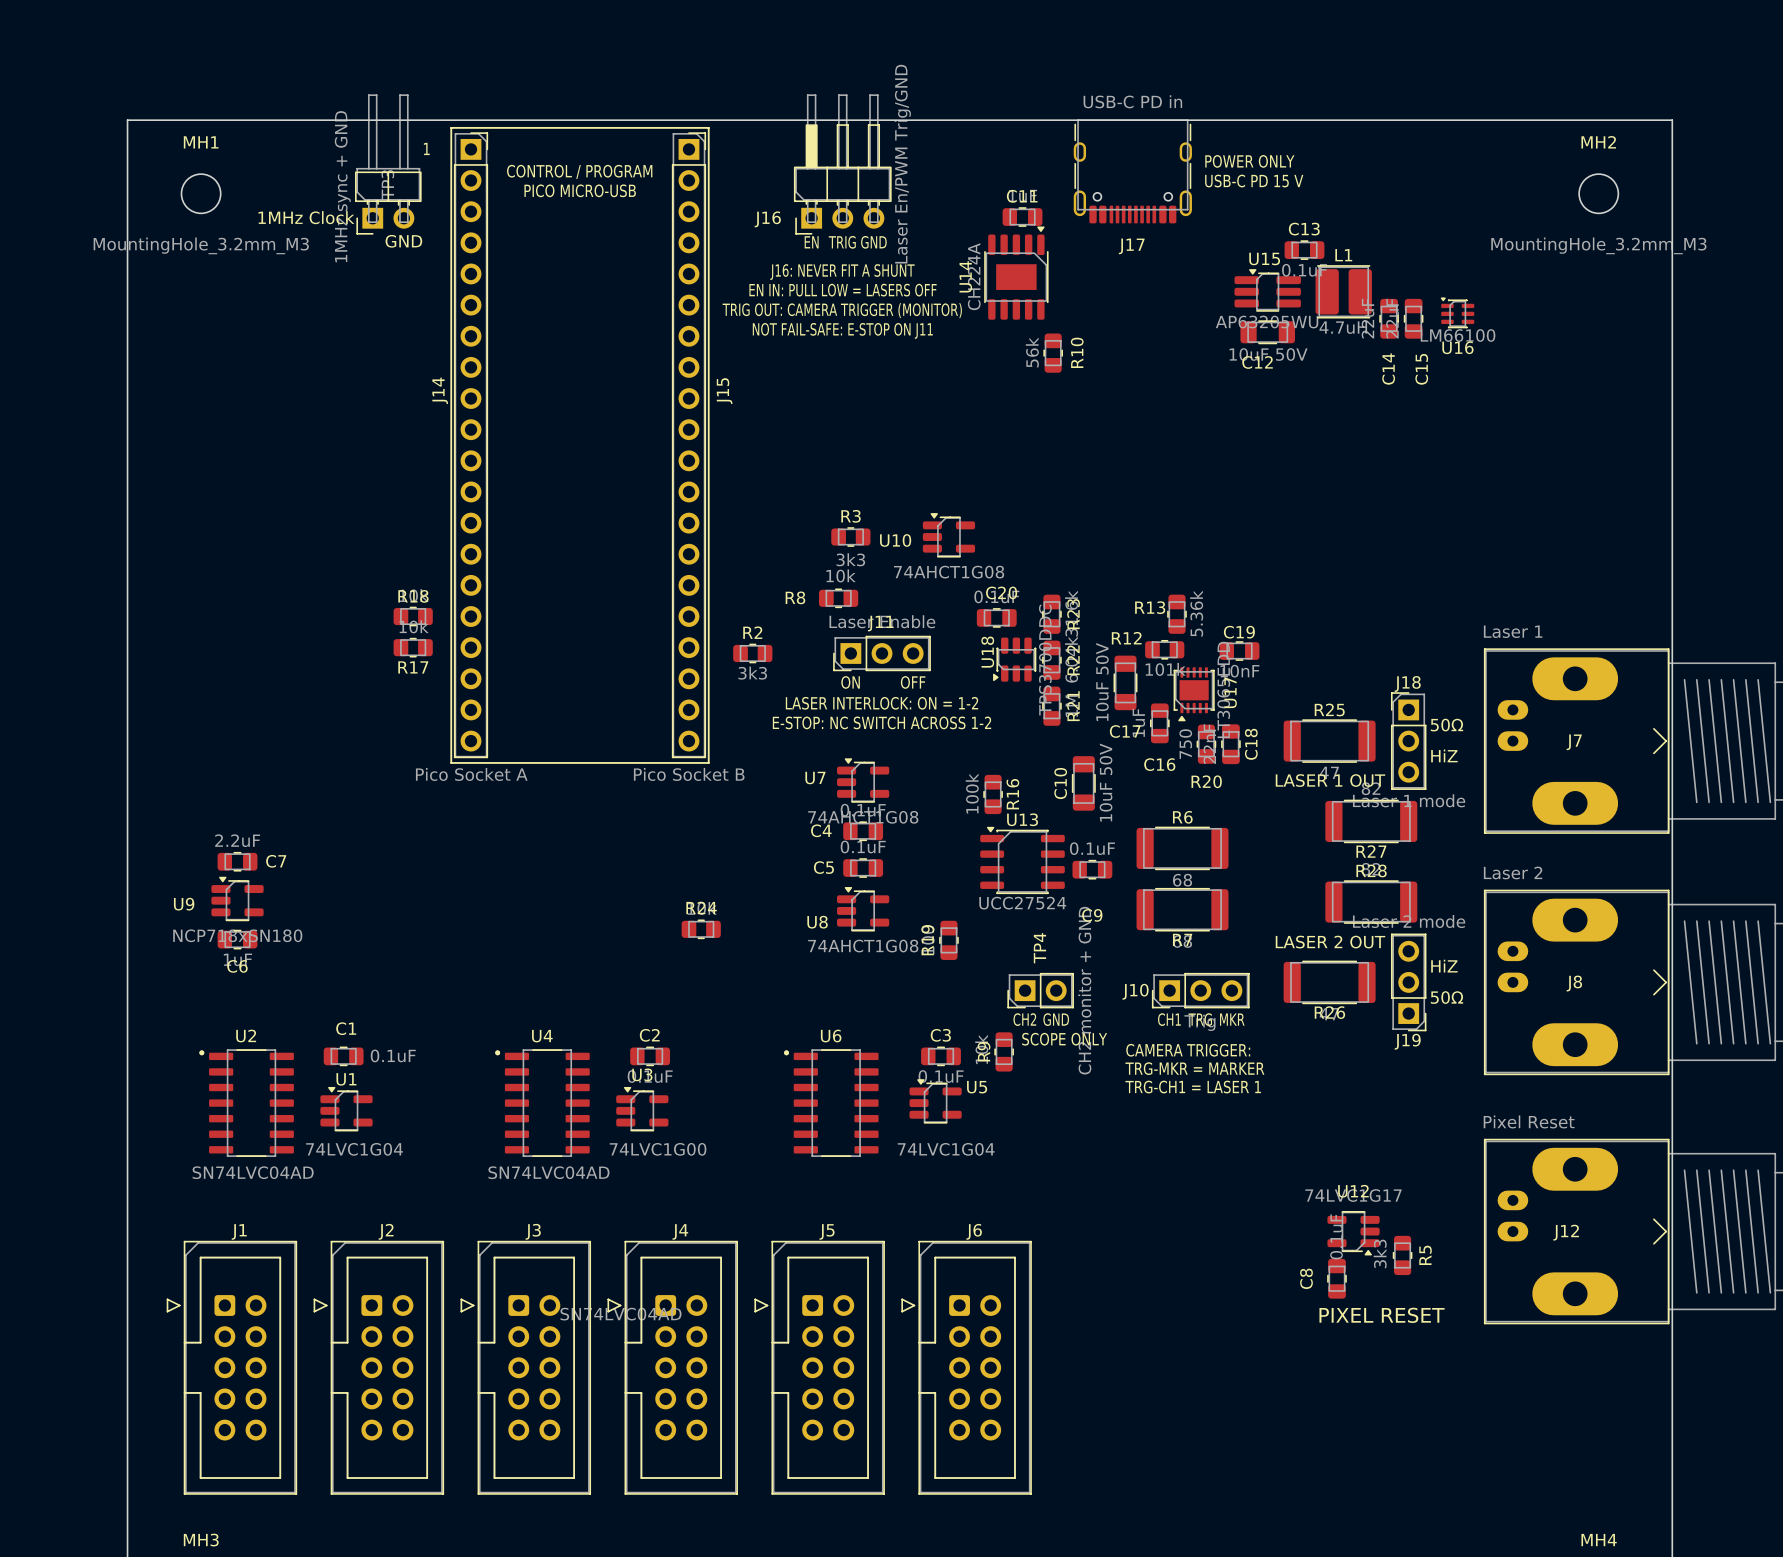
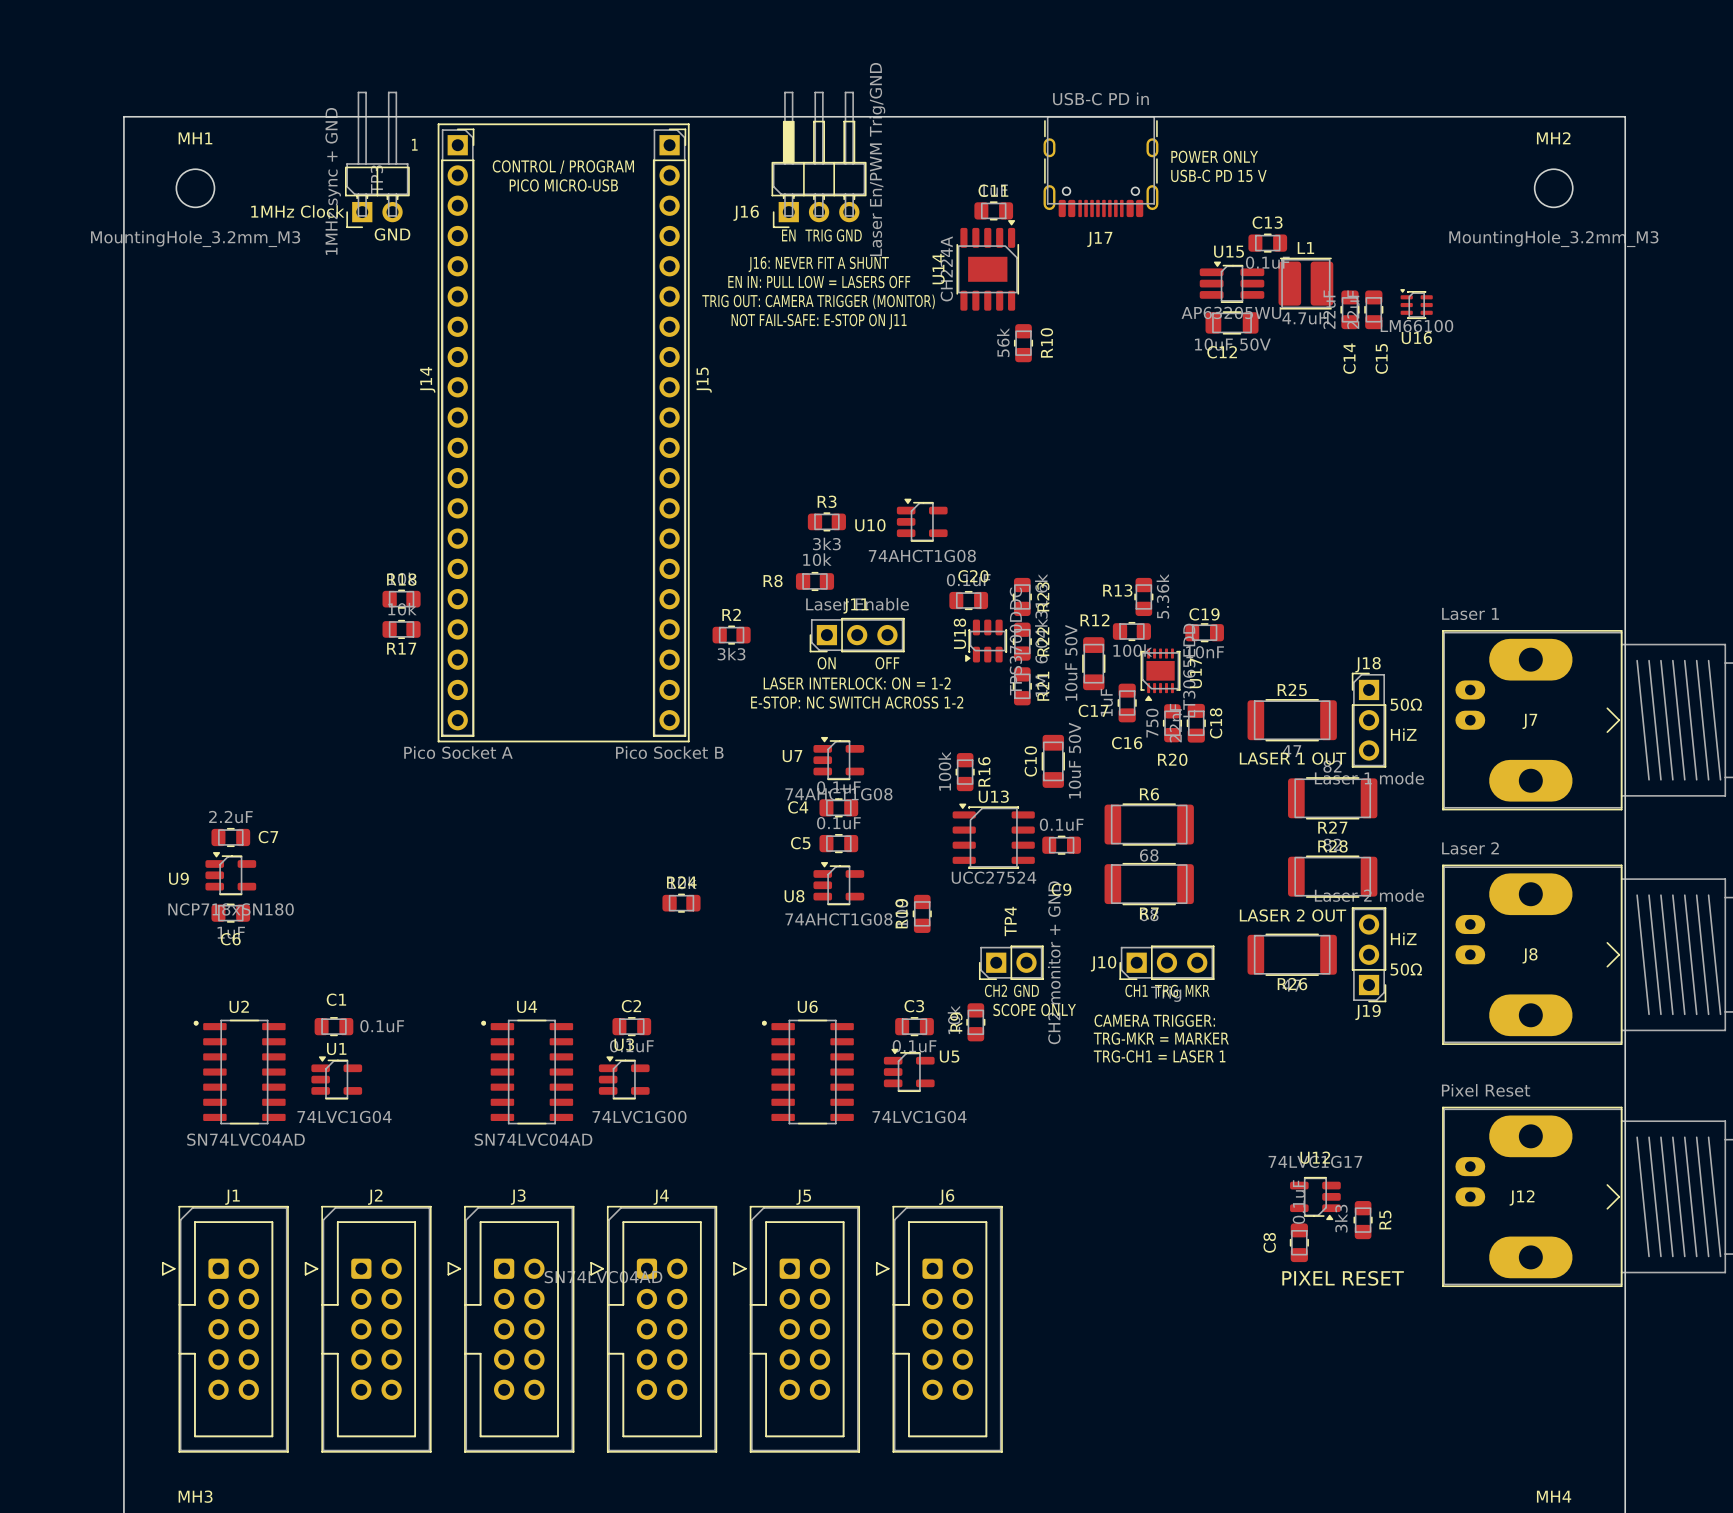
R12 value: 101k (1165, 669) -> 100k (1132, 650)

